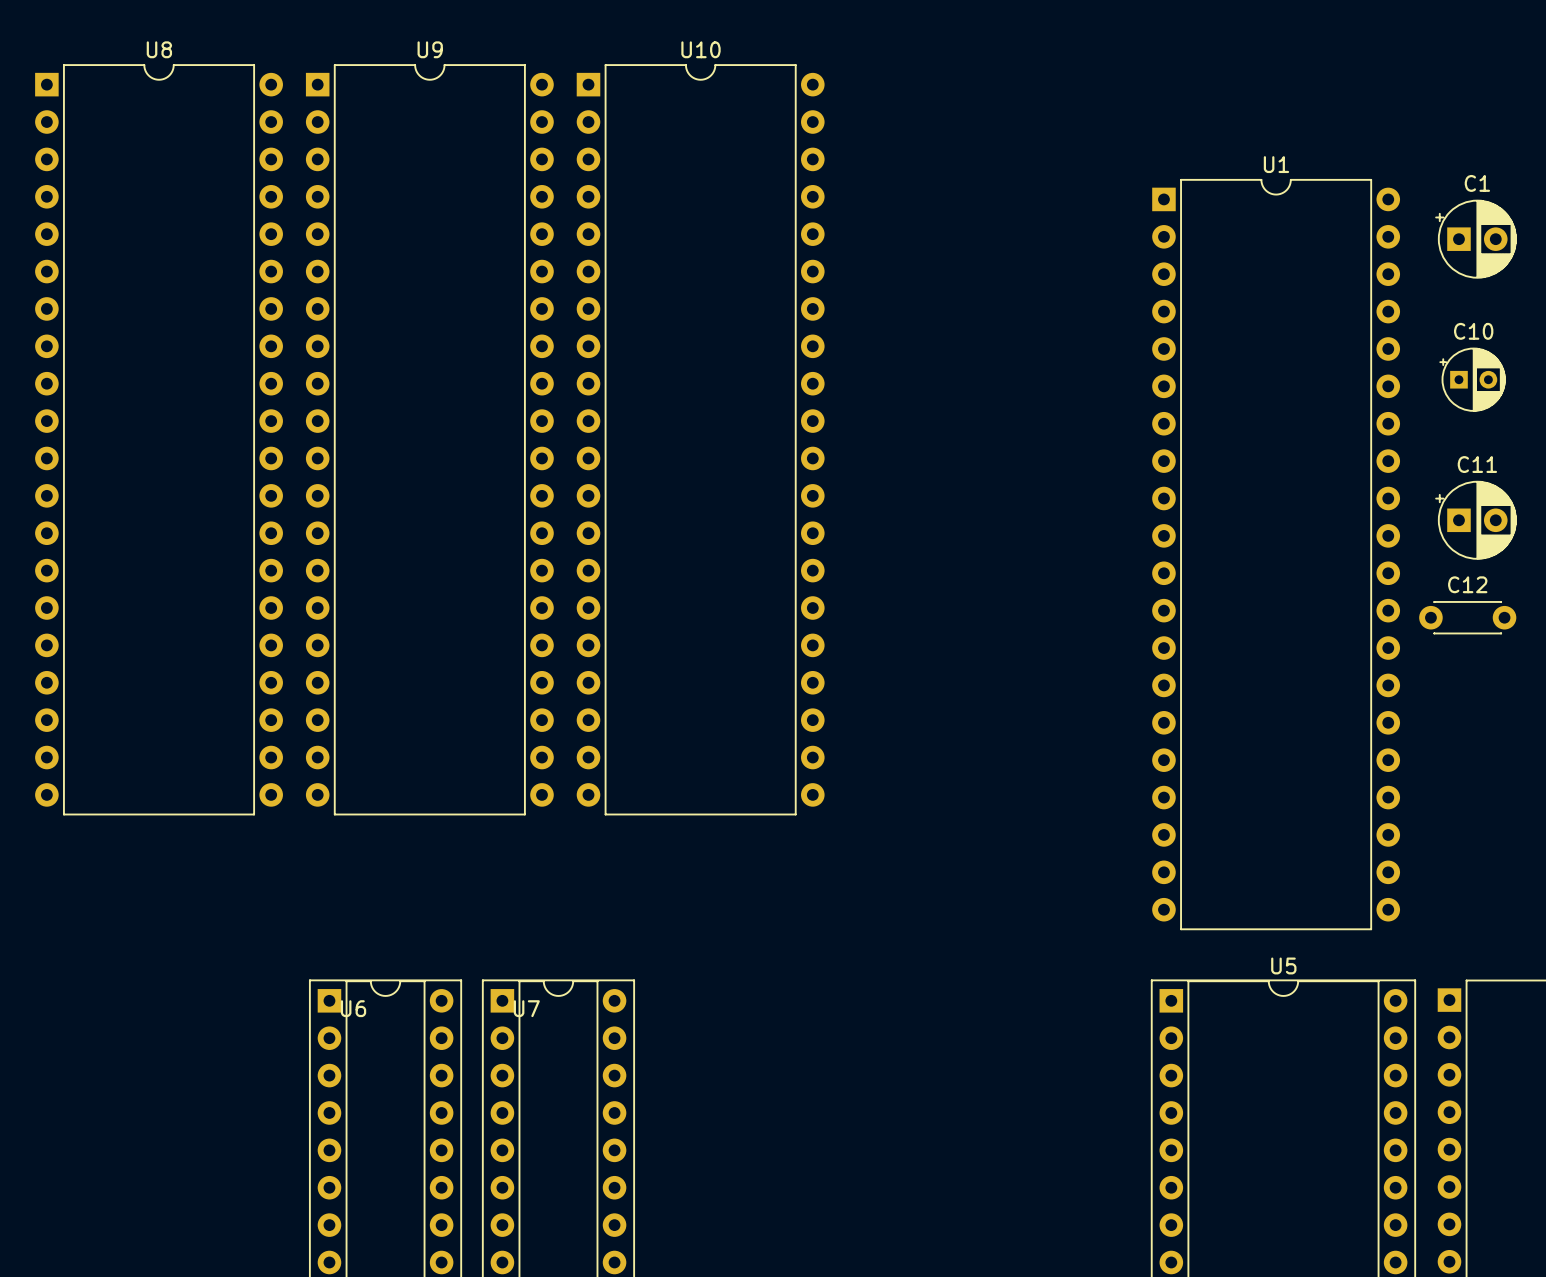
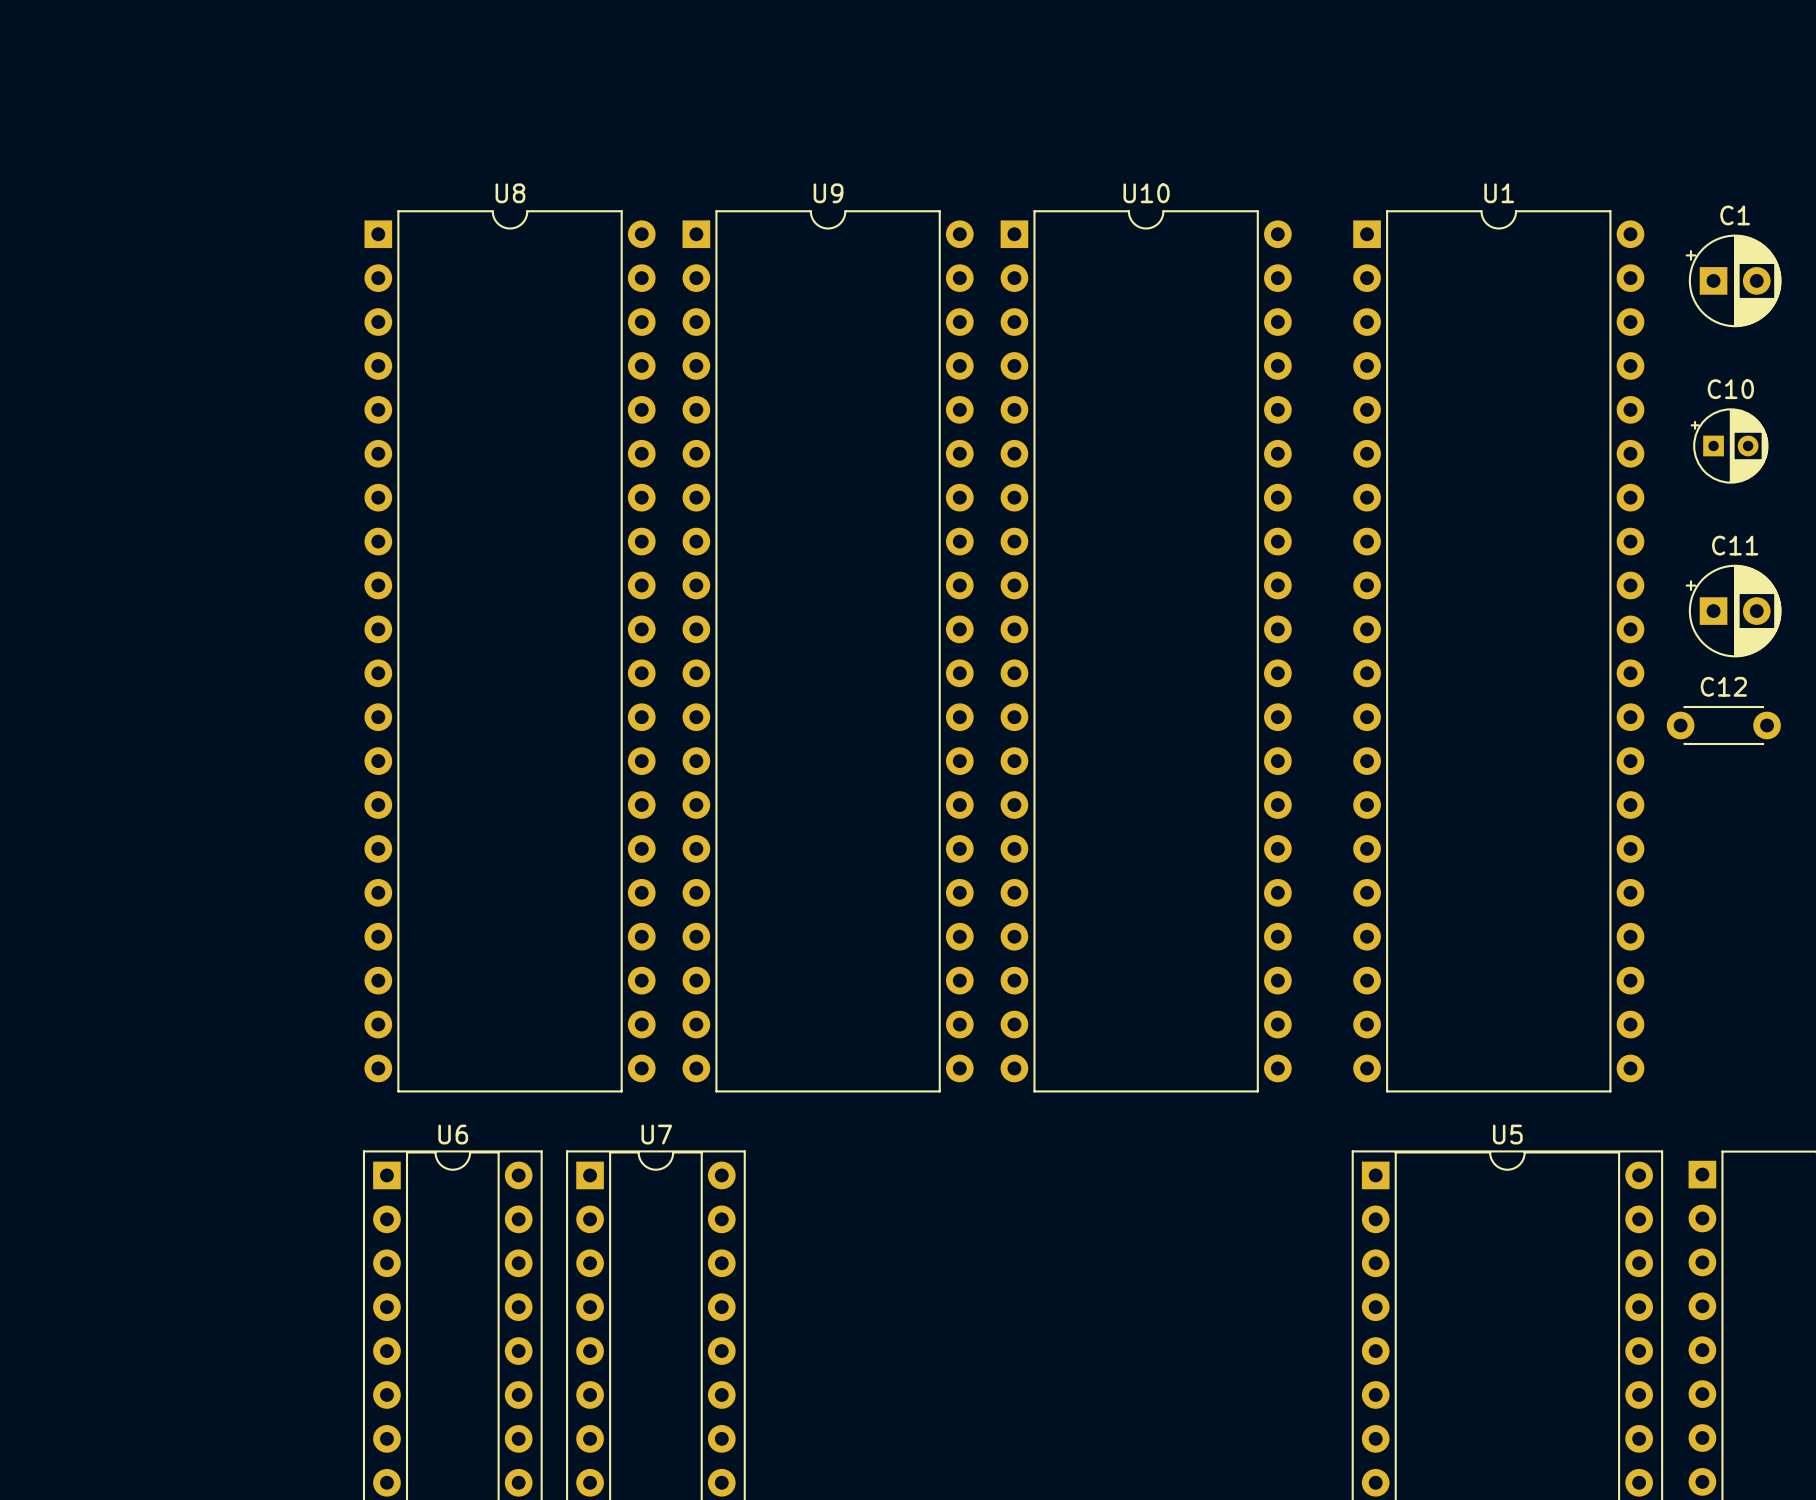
U8 position: (159, 439) -> (510, 651)
U9 position: (429, 439) -> (828, 651)
U10 position: (700, 439) -> (1146, 651)
U6 name position: U6 (353, 1008) -> U6 (453, 1134)
U7 name position: U7 (526, 1008) -> U7 (656, 1134)

